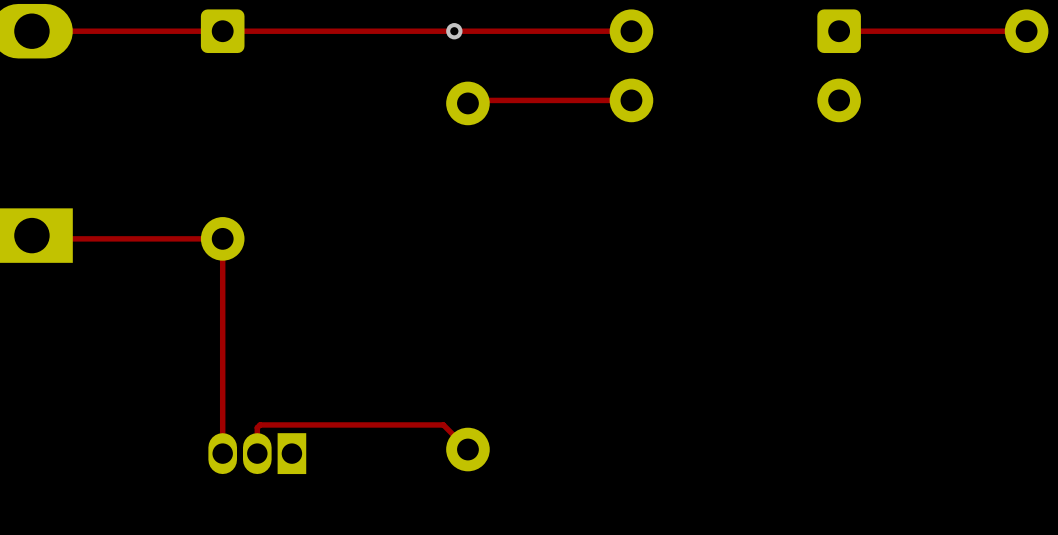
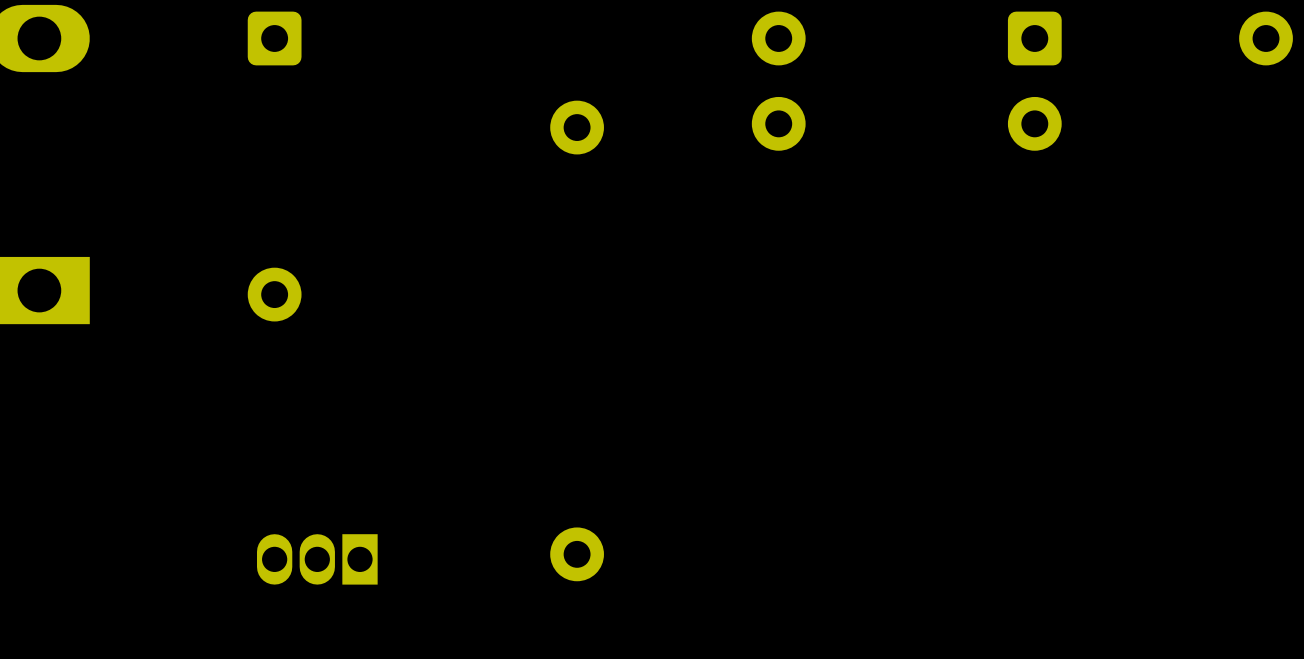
via: (454, 31) -> none
top track: (631, 31) (31, 31) -> none
top track: (1026, 31) (839, 31) -> none
top track: (631, 100) (470, 100) (467, 103) -> none
top track: (31, 235) (35, 238) (222, 238) (222, 453) -> none
top track: (467, 449) (443, 424) (260, 424) (257, 427) (257, 453) -> none

